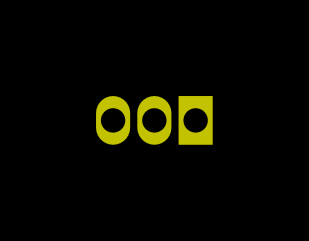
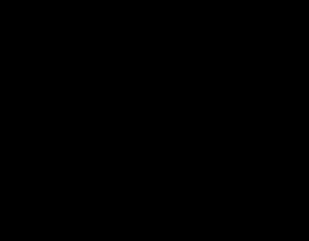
part: (154, 120) -> none

